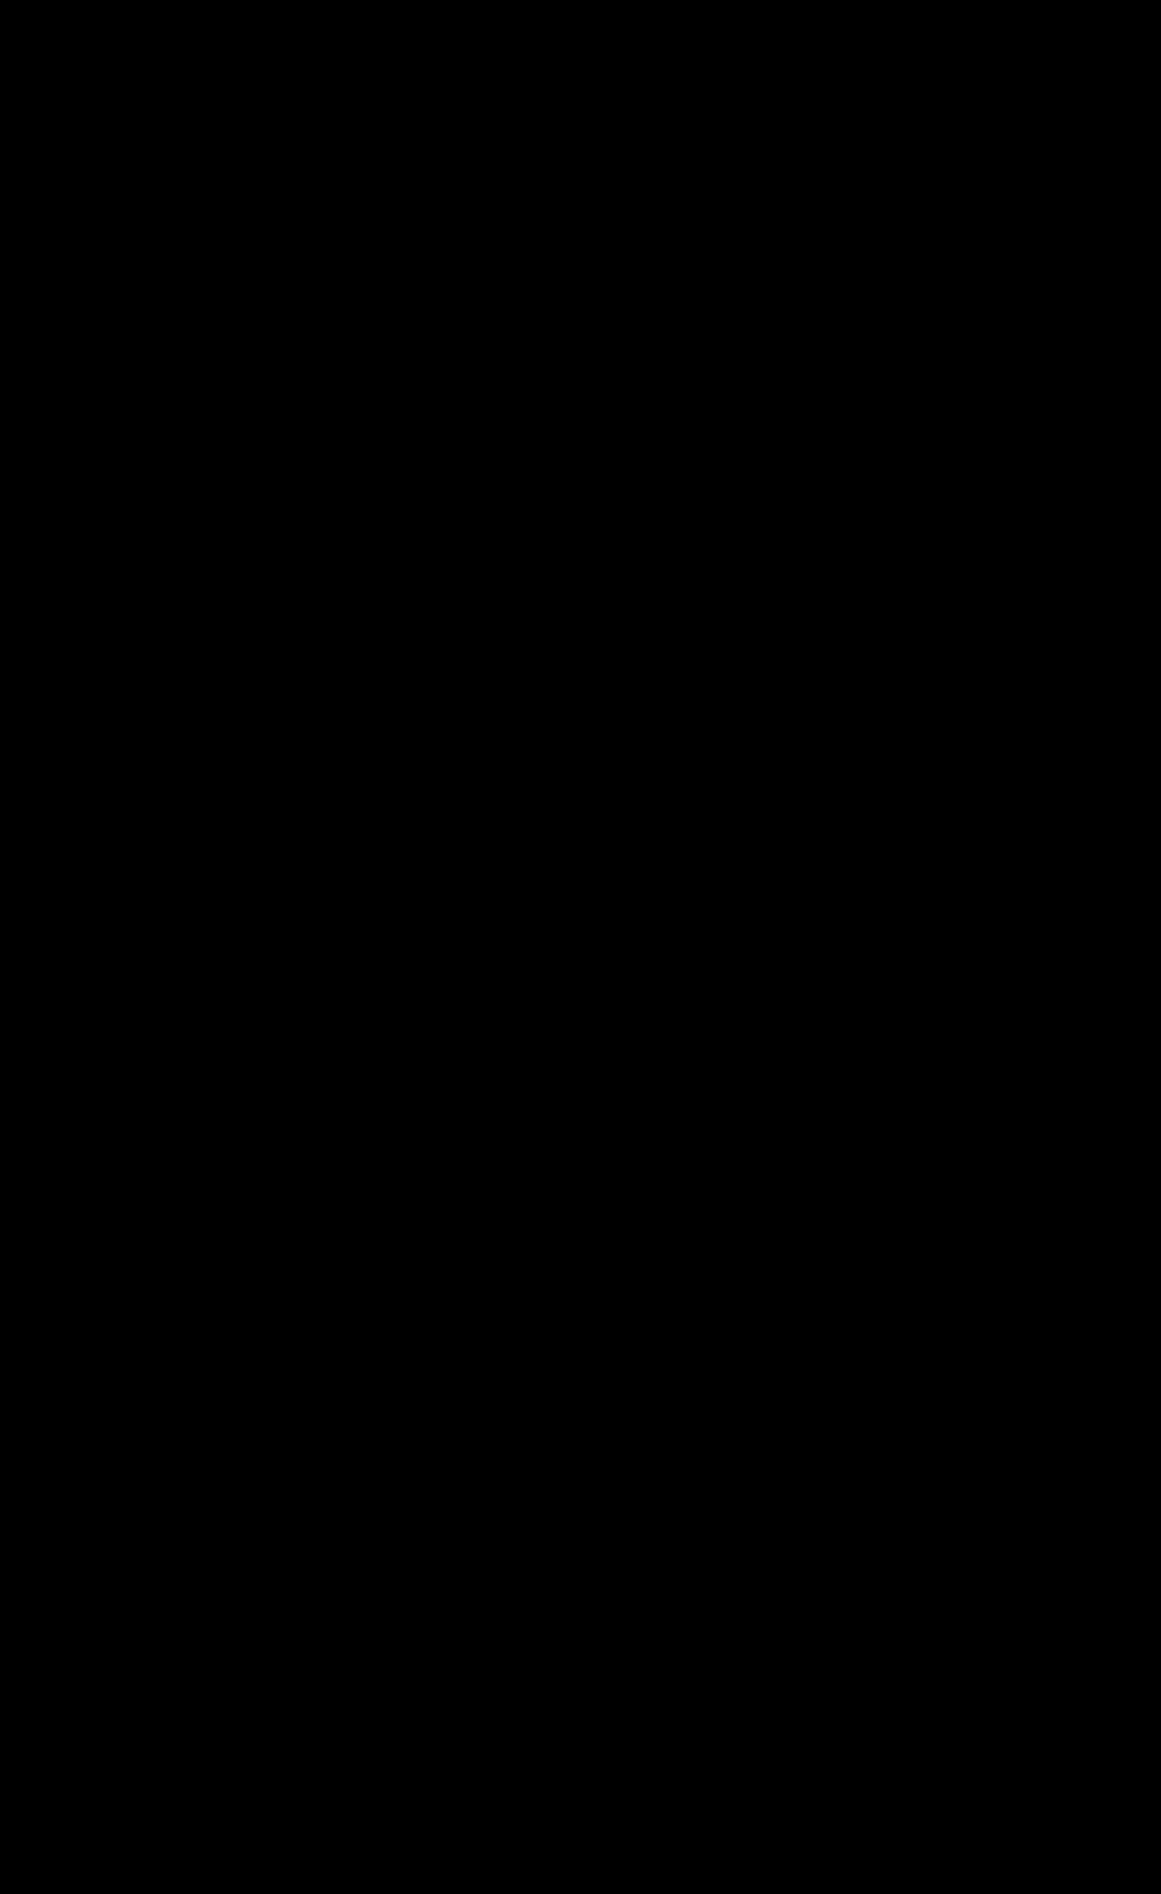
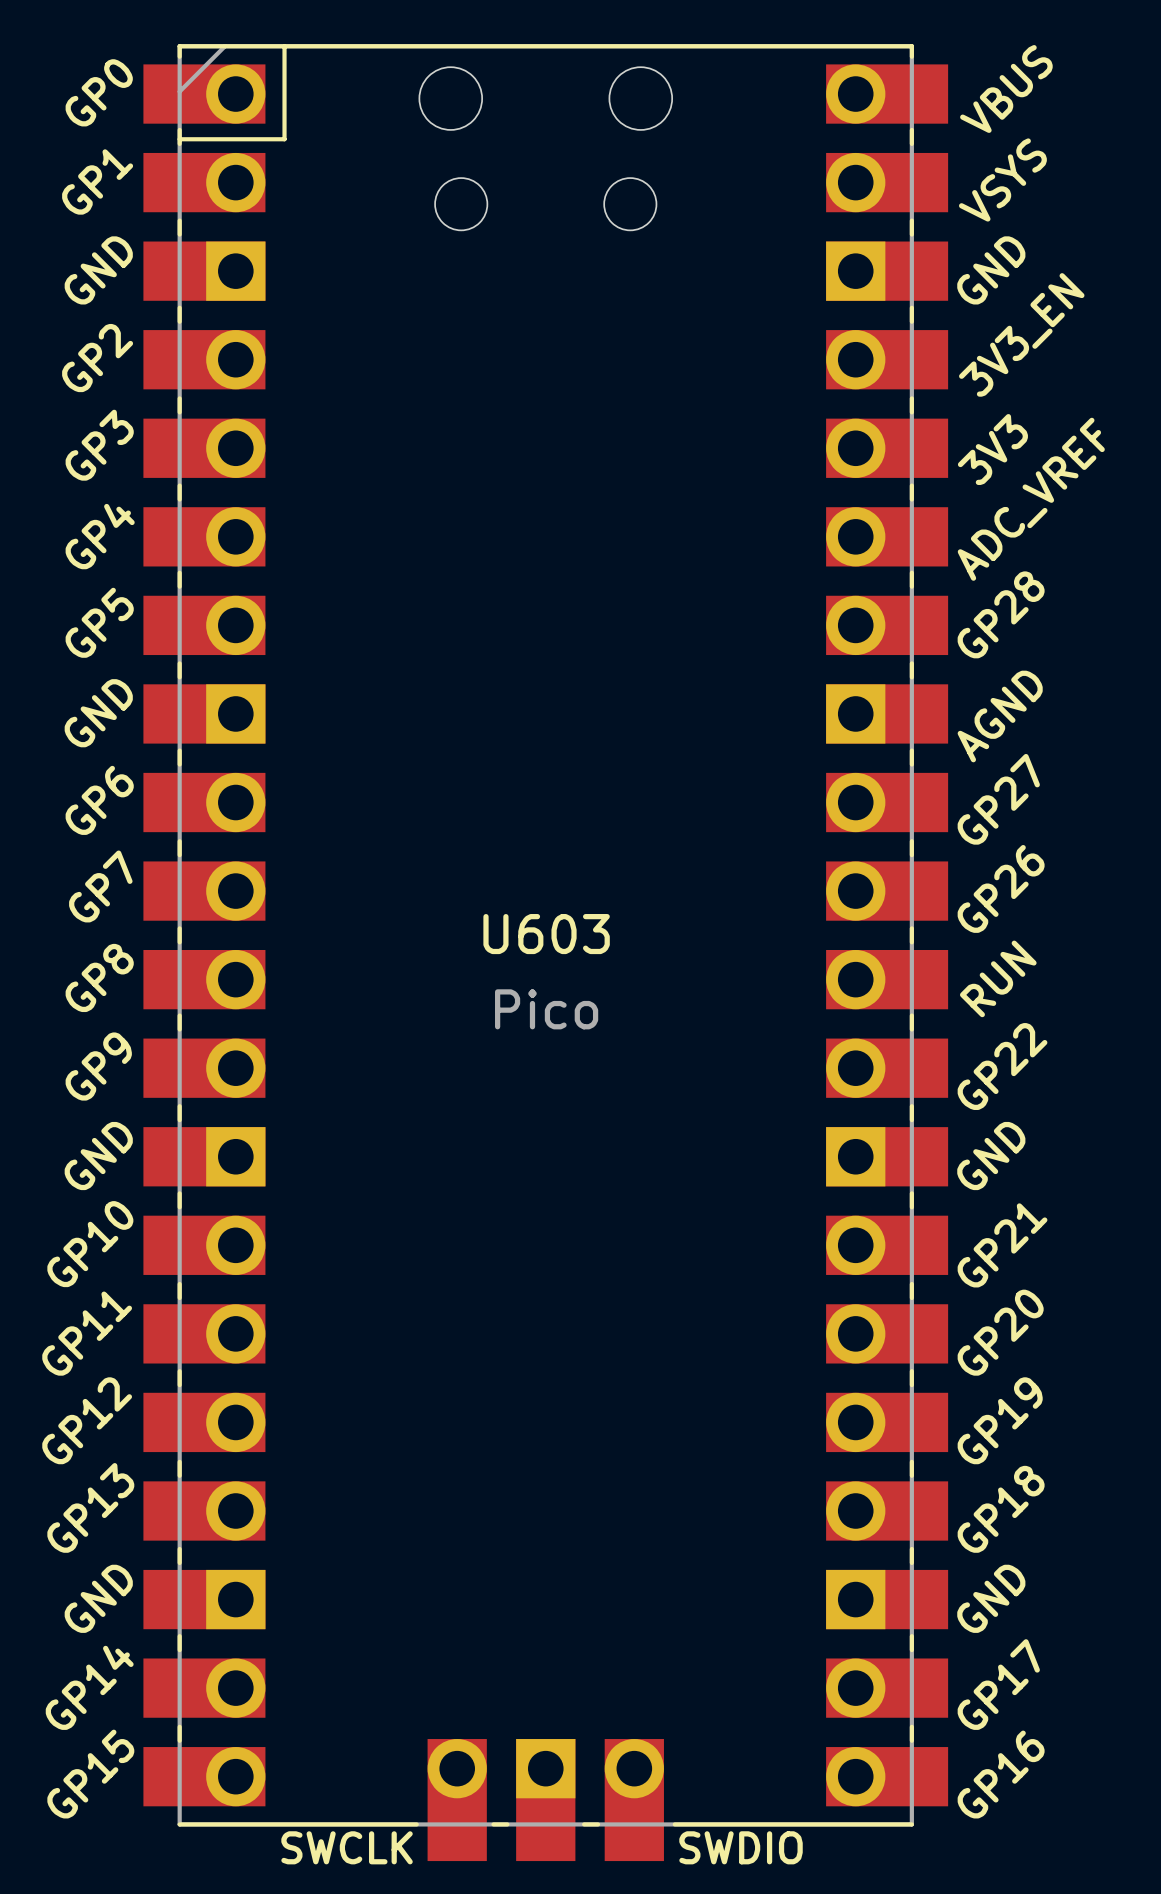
U603: none -> Pico (545, 952)

